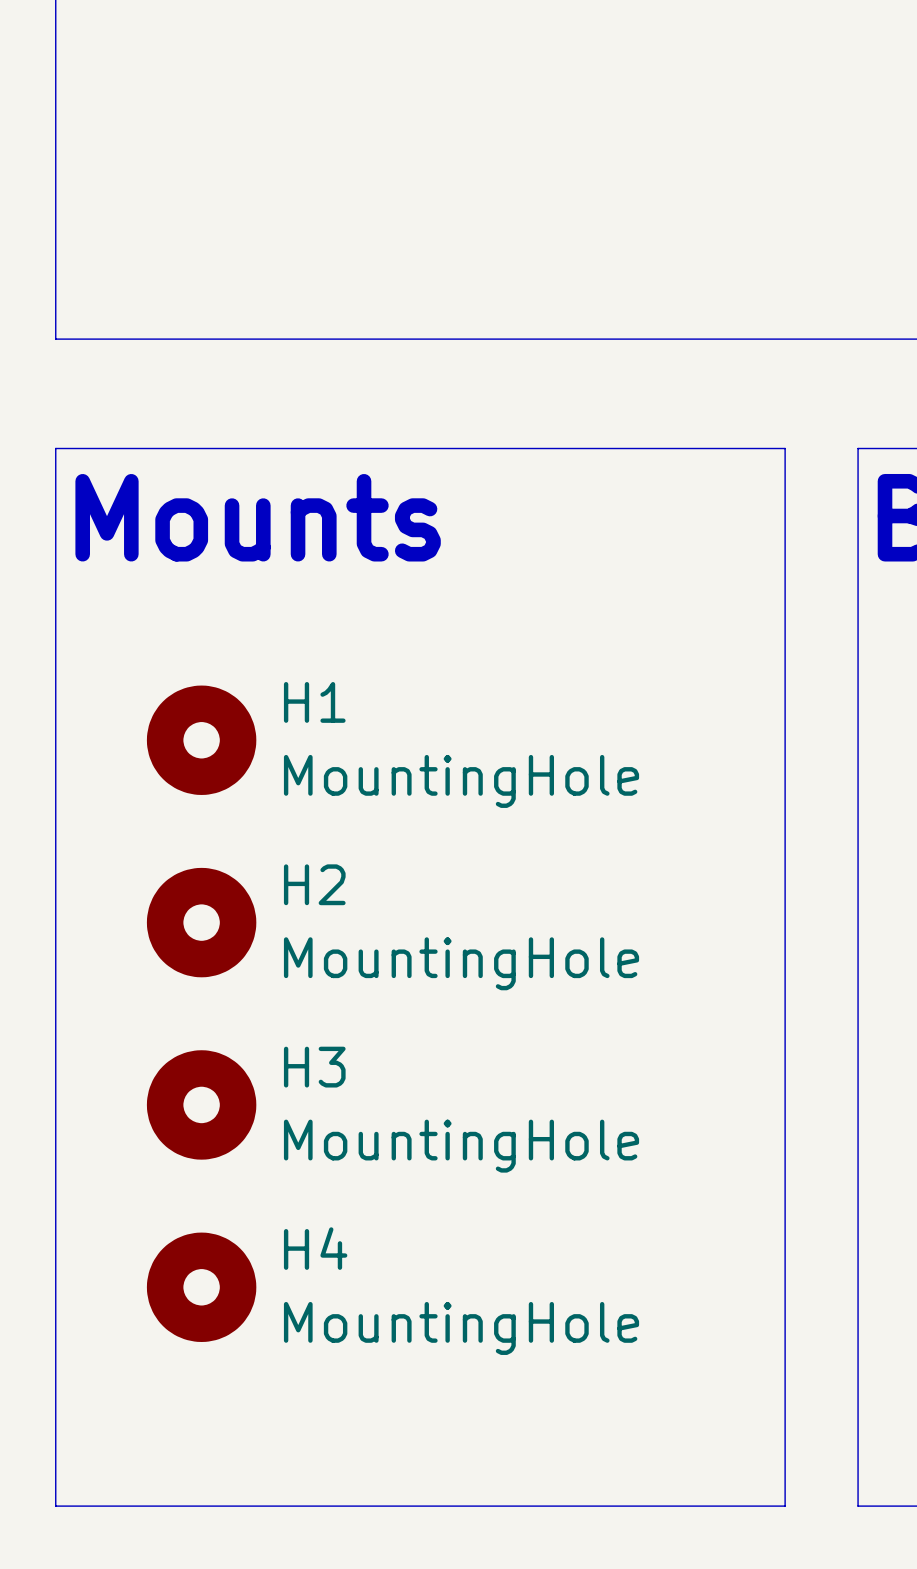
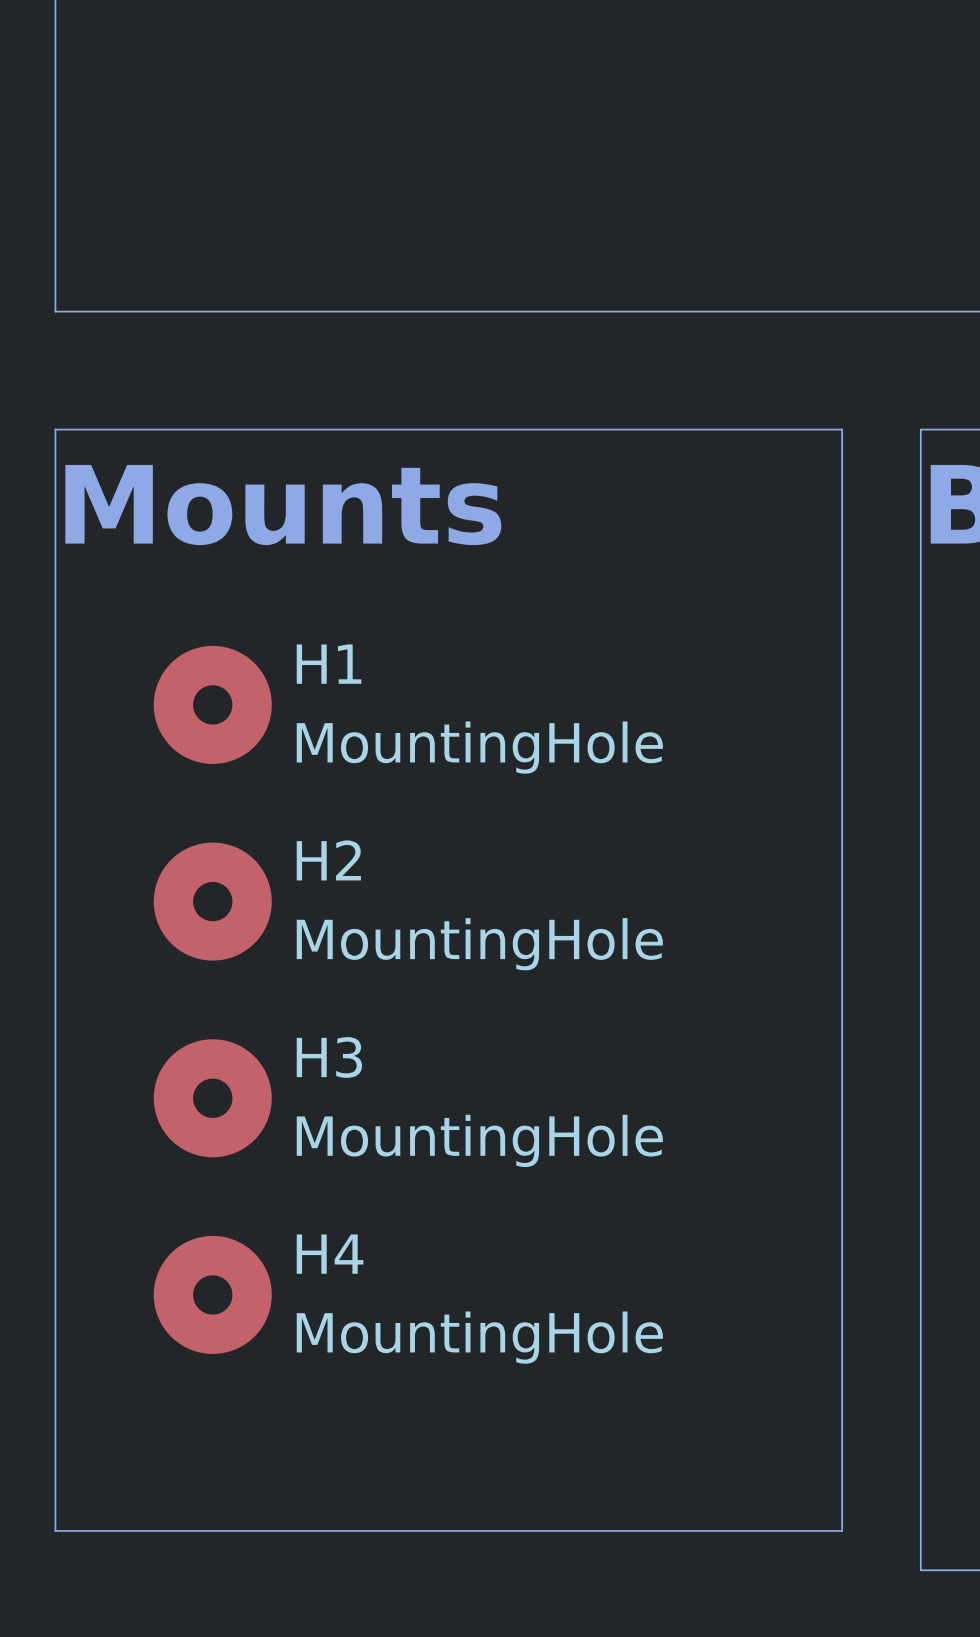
H1 position: (201, 740) -> (212, 704)
H2 position: (201, 922) -> (212, 901)
H3 position: (201, 1104) -> (212, 1098)
H4 position: (201, 1287) -> (212, 1294)
line: (55, 1469) (55, 1506) (785, 1506) (785, 1469) -> (55, 1530) (842, 1530)

